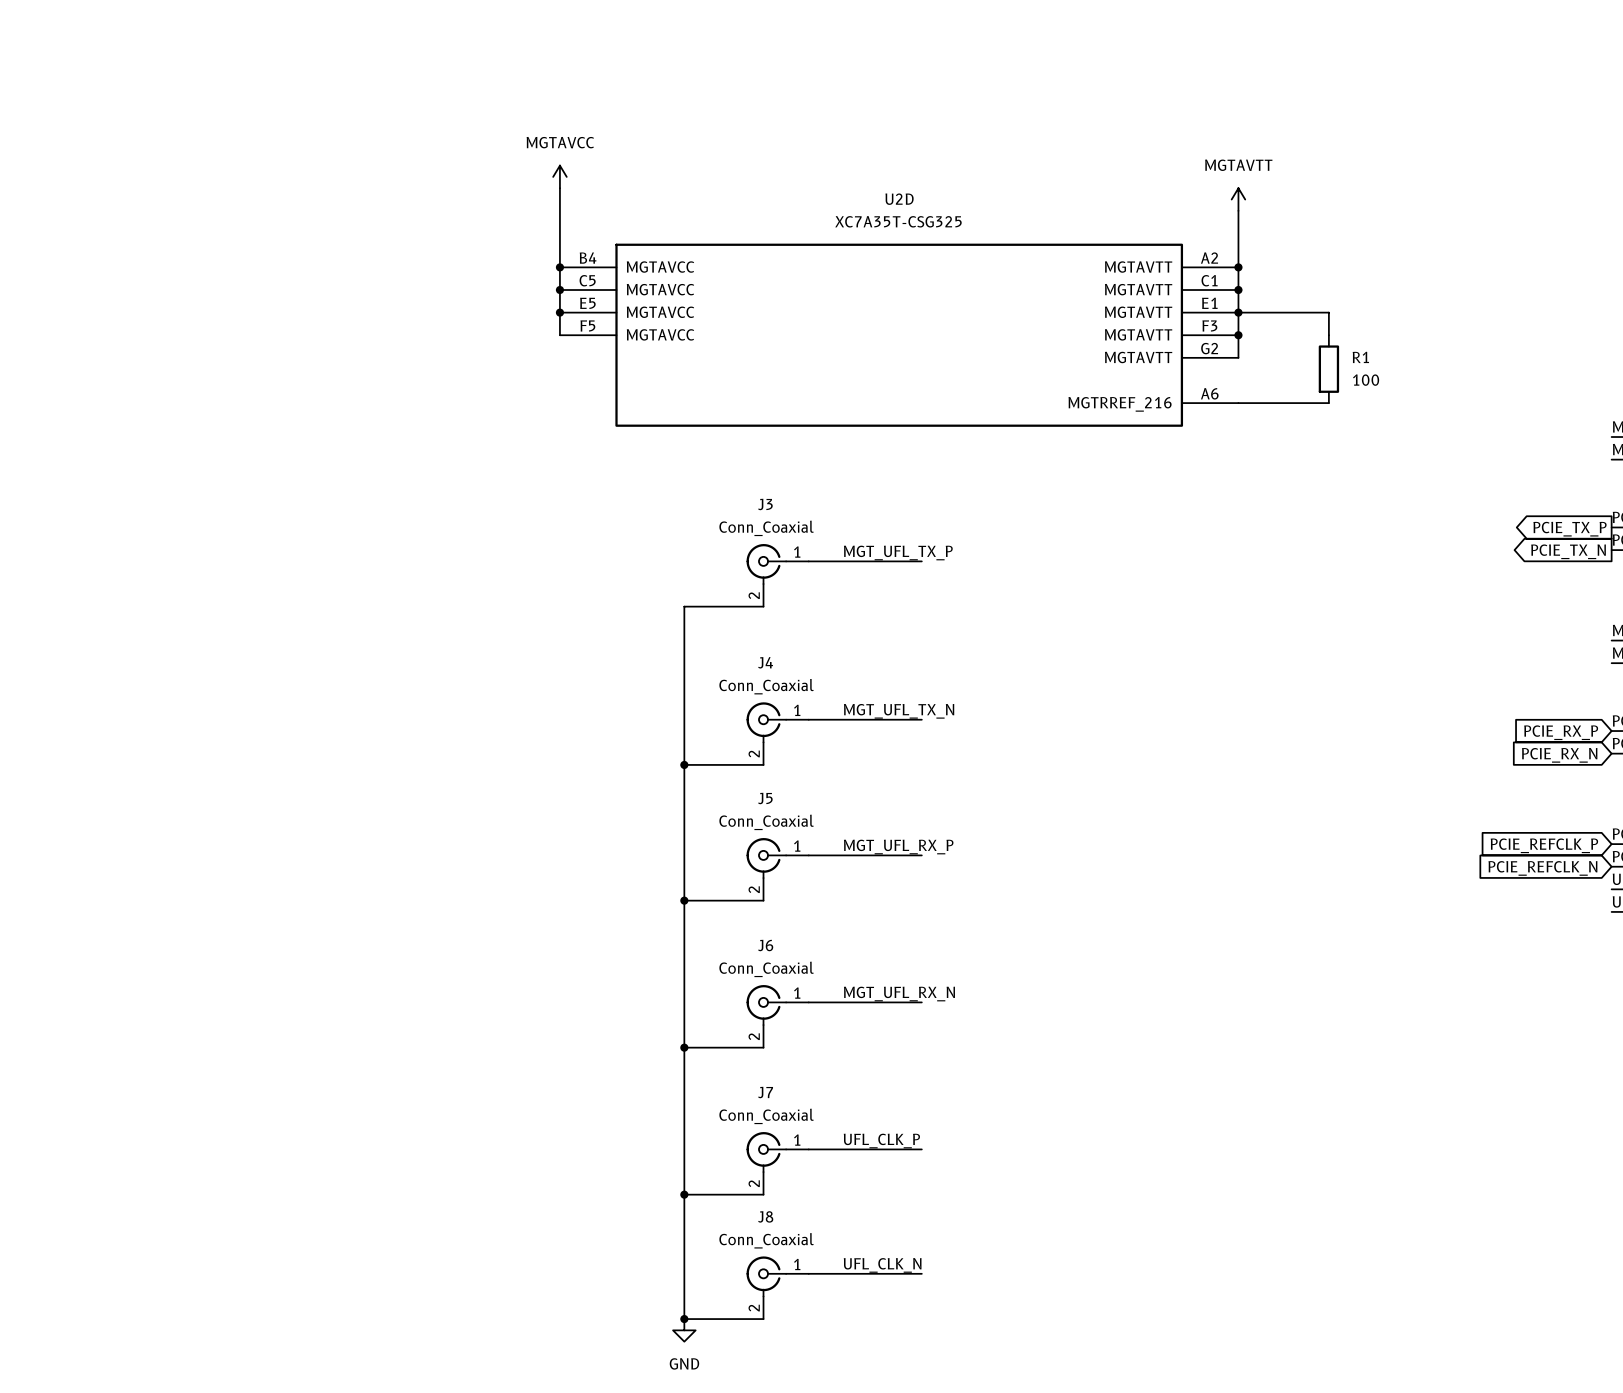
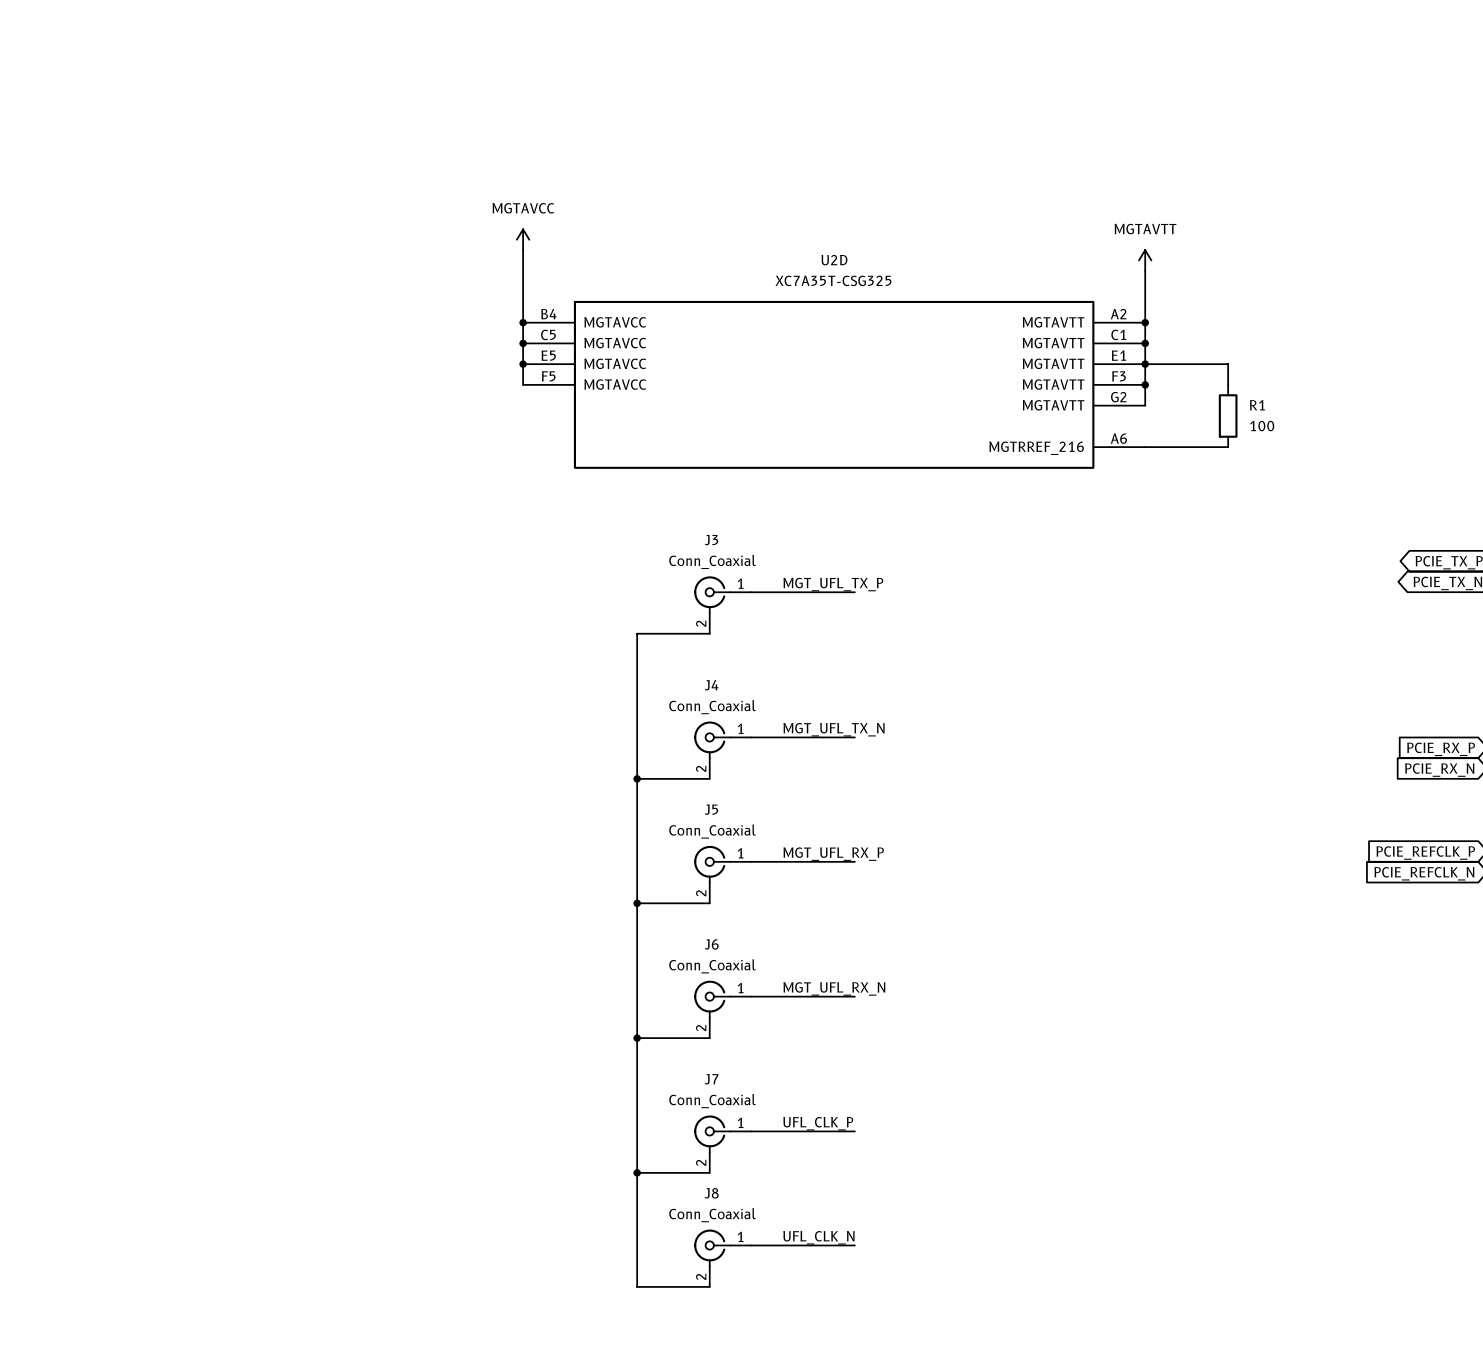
junction: (684, 1319) -> none
power symbol: GND (684, 1330) -> none

